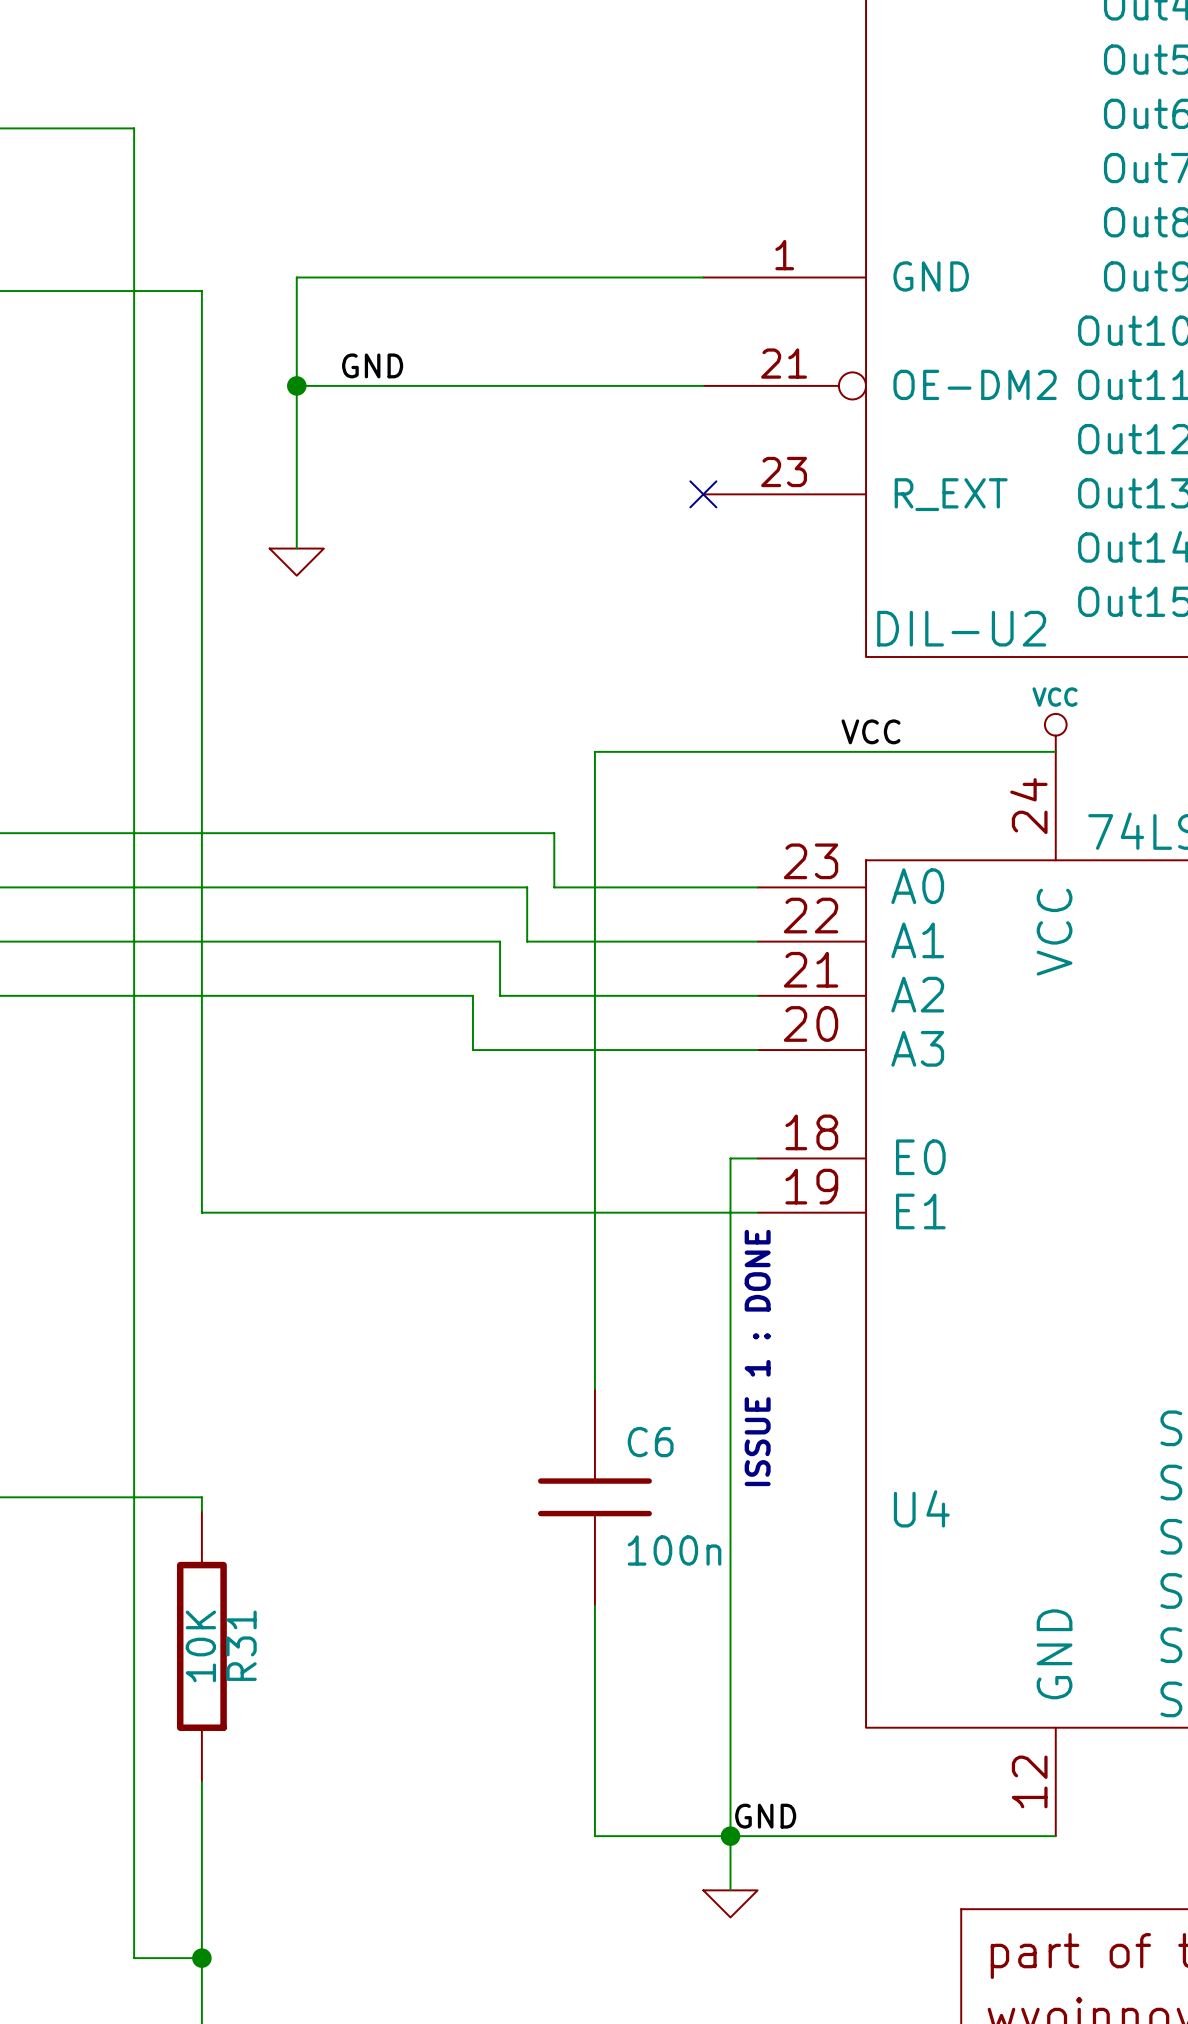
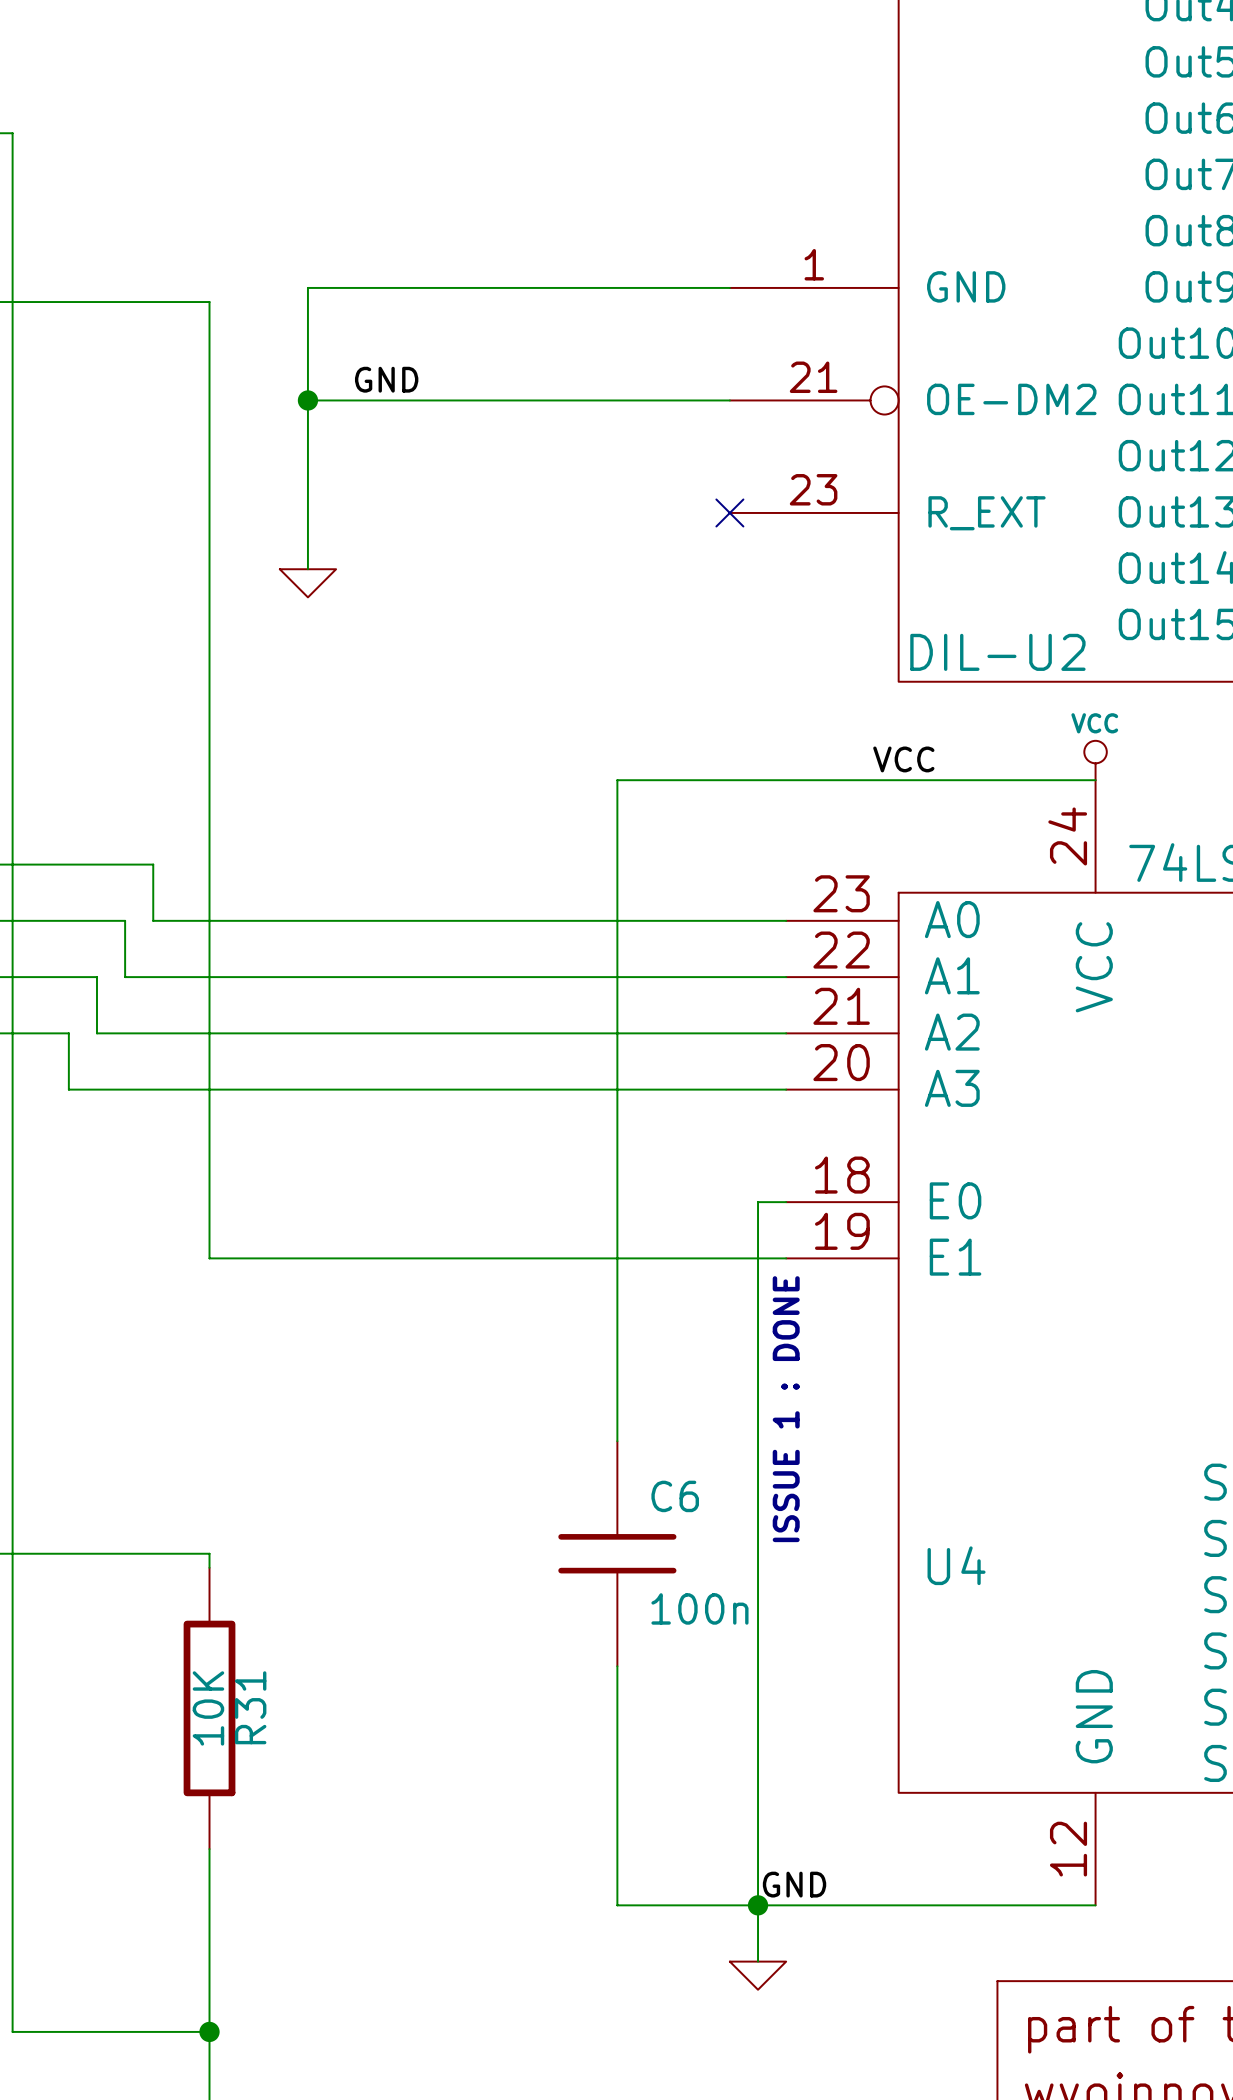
wire: (12, 128) (134, 128) (134, 1958) -> (12, 133) (12, 2031) (139, 2031)
wire: (147, 833) (554, 833) (554, 887) -> none
wire: (120, 887) (147, 887) -> (153, 864) (153, 920)
wire: (527, 887) (527, 941) -> (547, 920) (575, 920)
wire: (93, 941) (120, 941) -> (96, 977) (96, 1033)
wire: (500, 941) (500, 995) -> (490, 1033) (518, 1033)
wire: none -> (518, 977) (547, 977)
wire: (66, 995) (93, 995) -> (68, 1033) (68, 1089) (490, 1089)
wire: (472, 995) (472, 1050) -> (125, 920) (125, 977)

